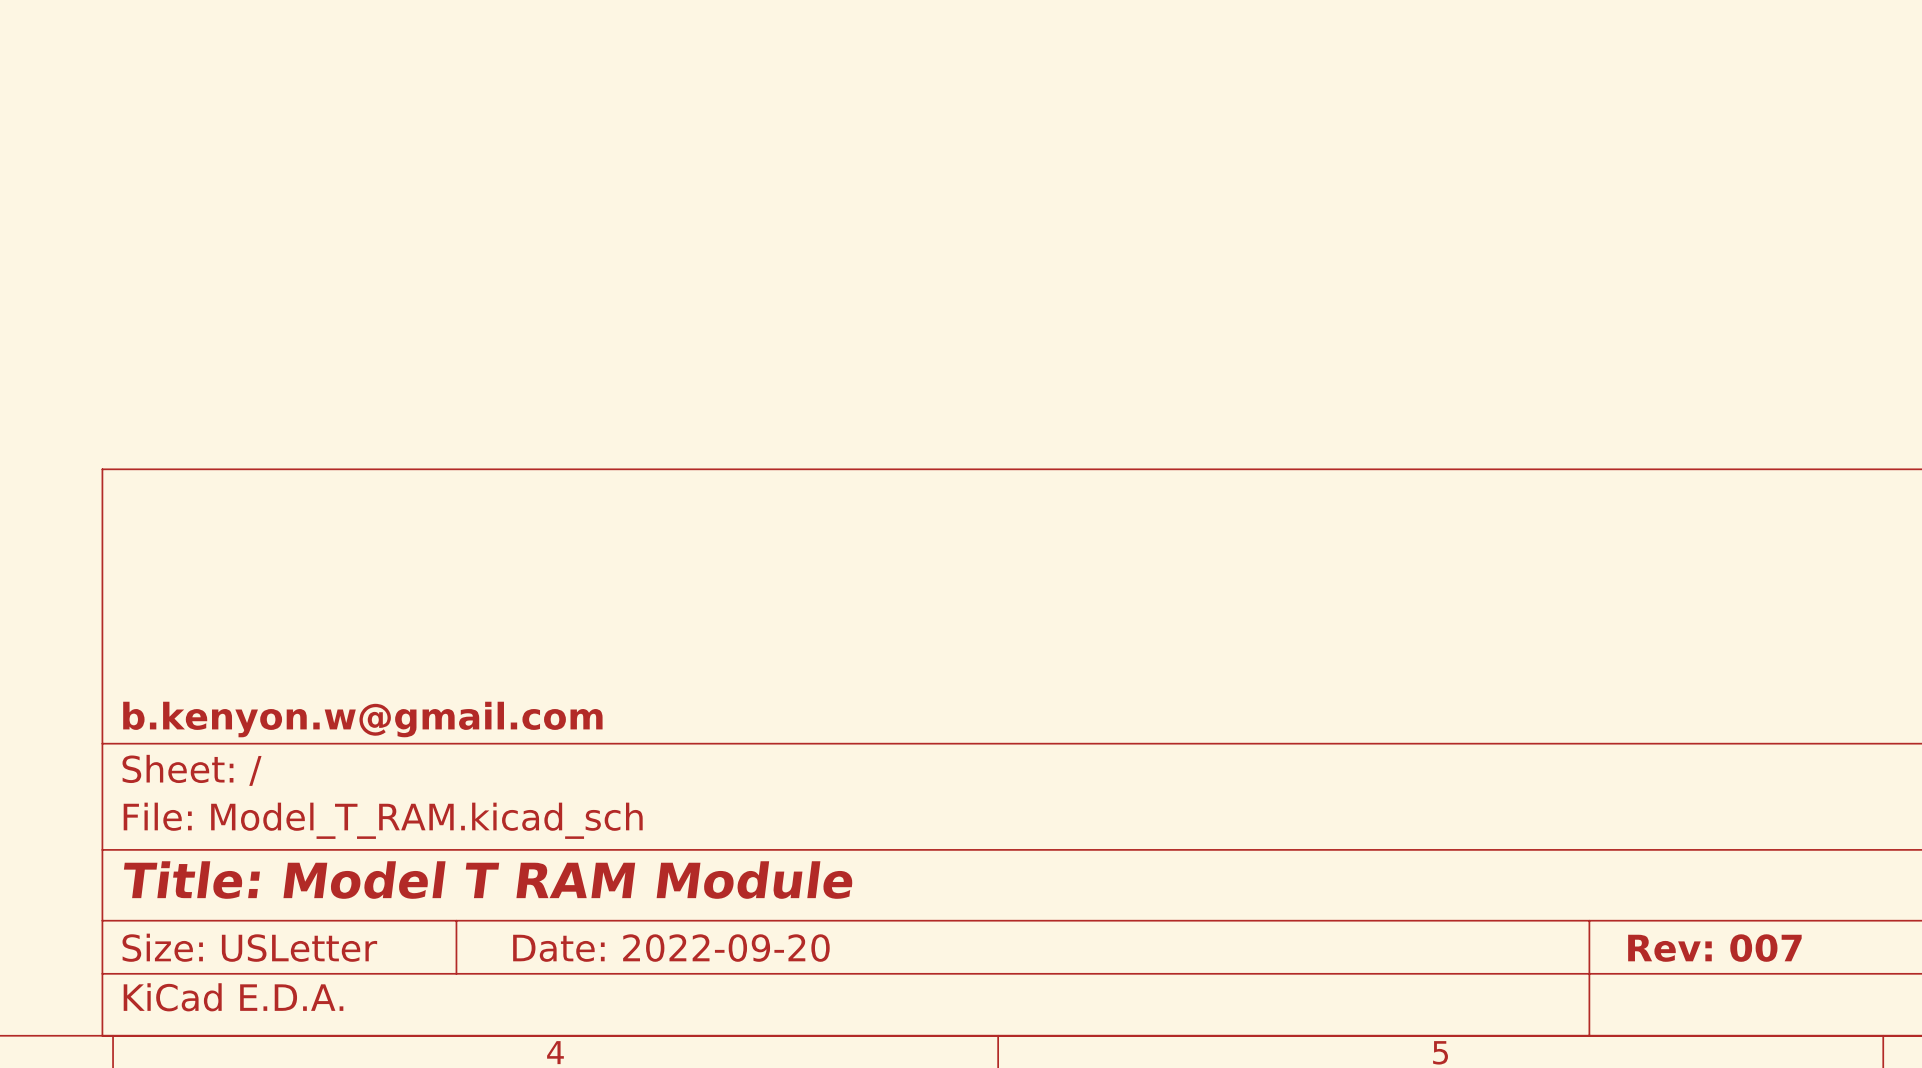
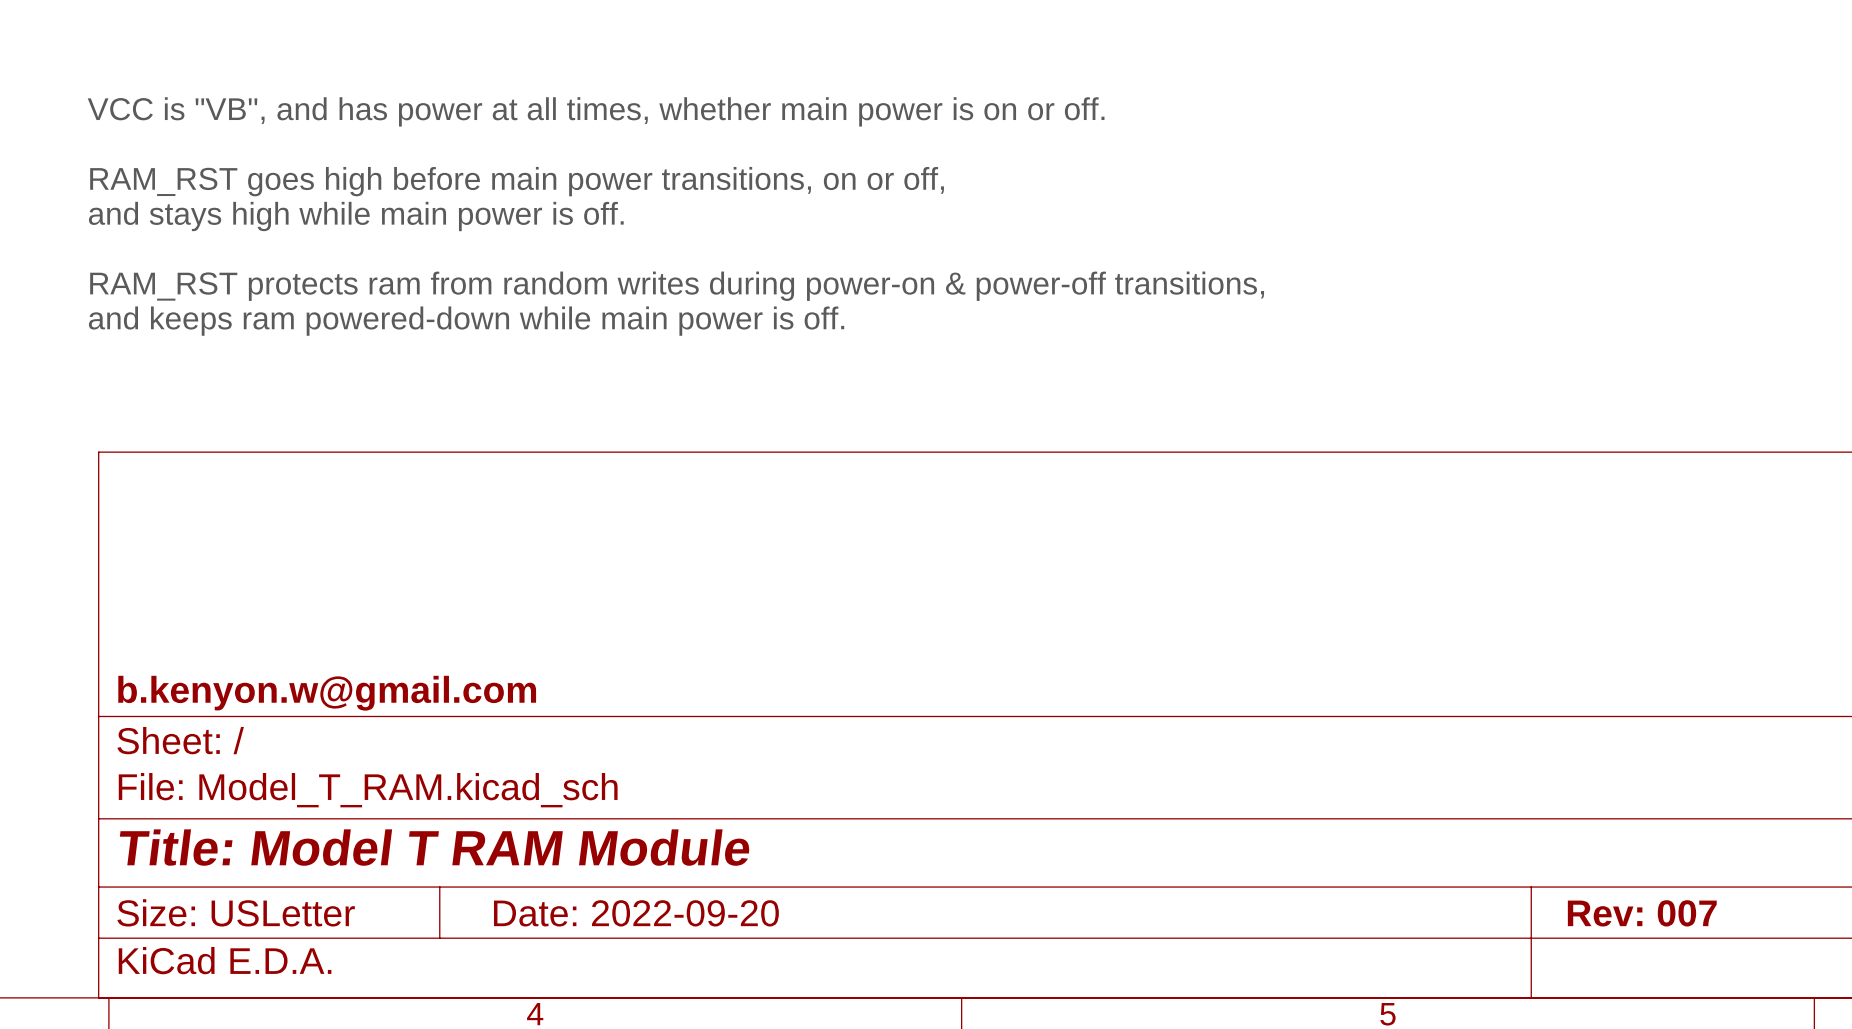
text: none -> VCC is "VB", and has power at all times, whether main power is on or off. (596, 111)
text: none -> RAM_RST goes high before main power transitions, on or off, (517, 181)
text: none -> and stays high while main power is off. (356, 216)
text: none -> RAM_RST protects ram from random writes during power-on & power-off transitions, (677, 286)
text: none -> and keeps ram powered-down while main power is off. (466, 321)

